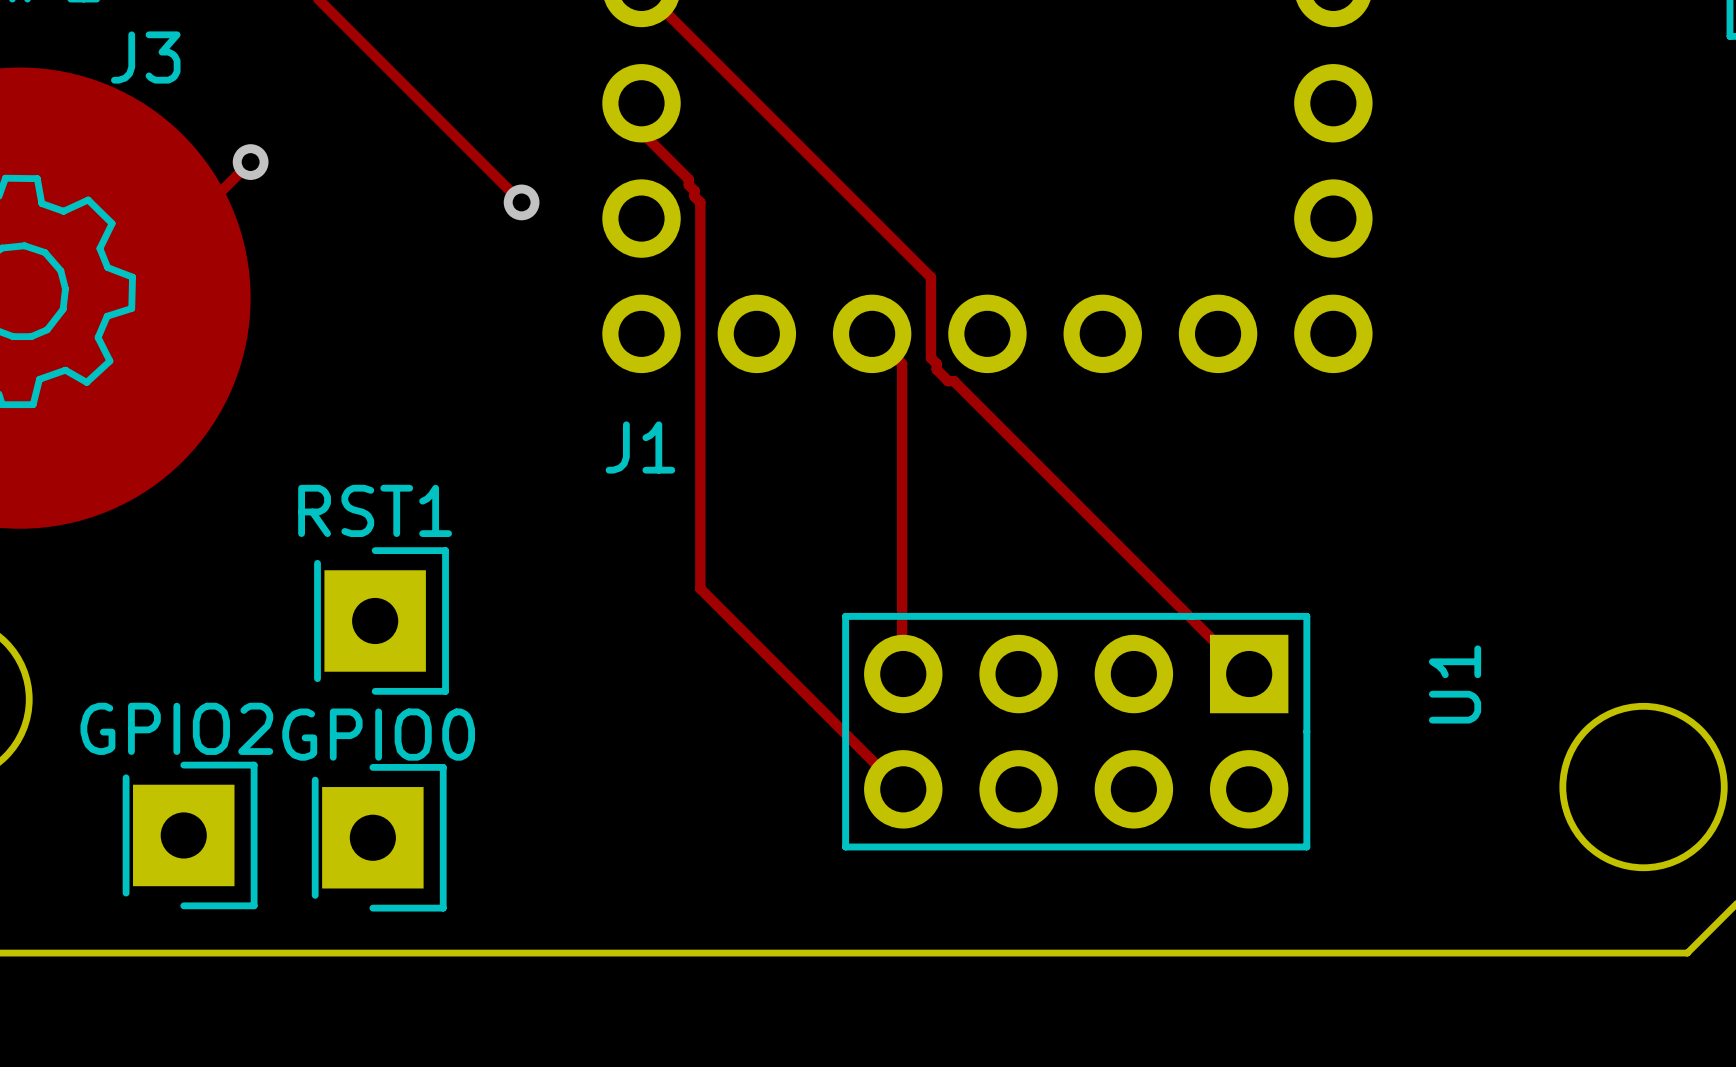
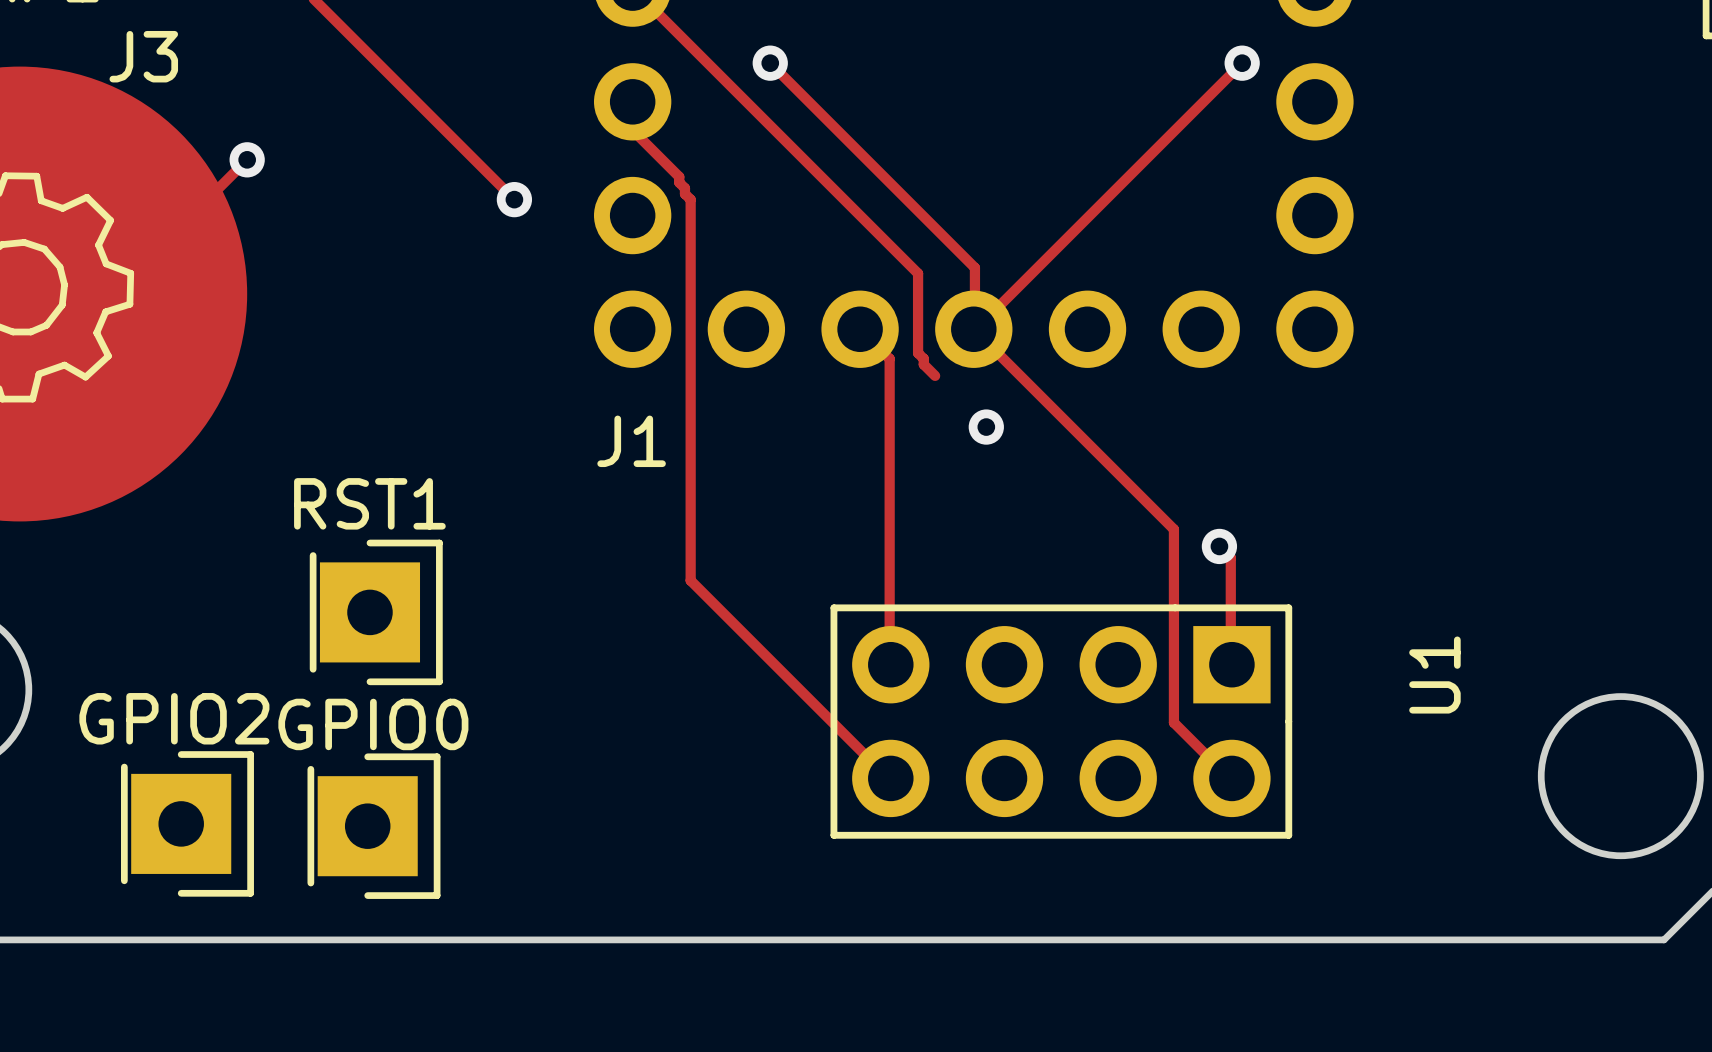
track: none -> (770, 63) (974, 267) (974, 330)
via: none -> (770, 63)
track: none -> (1242, 63) (980, 324) (973, 329) (1173, 529) (1173, 722) (1230, 779) (1231, 778)
via: none -> (1242, 63)
track: (948, 381) (954, 381) (1248, 675) -> (1219, 546) (1230, 557) (1230, 665)
via: none -> (986, 427)
via: none -> (1219, 546)

